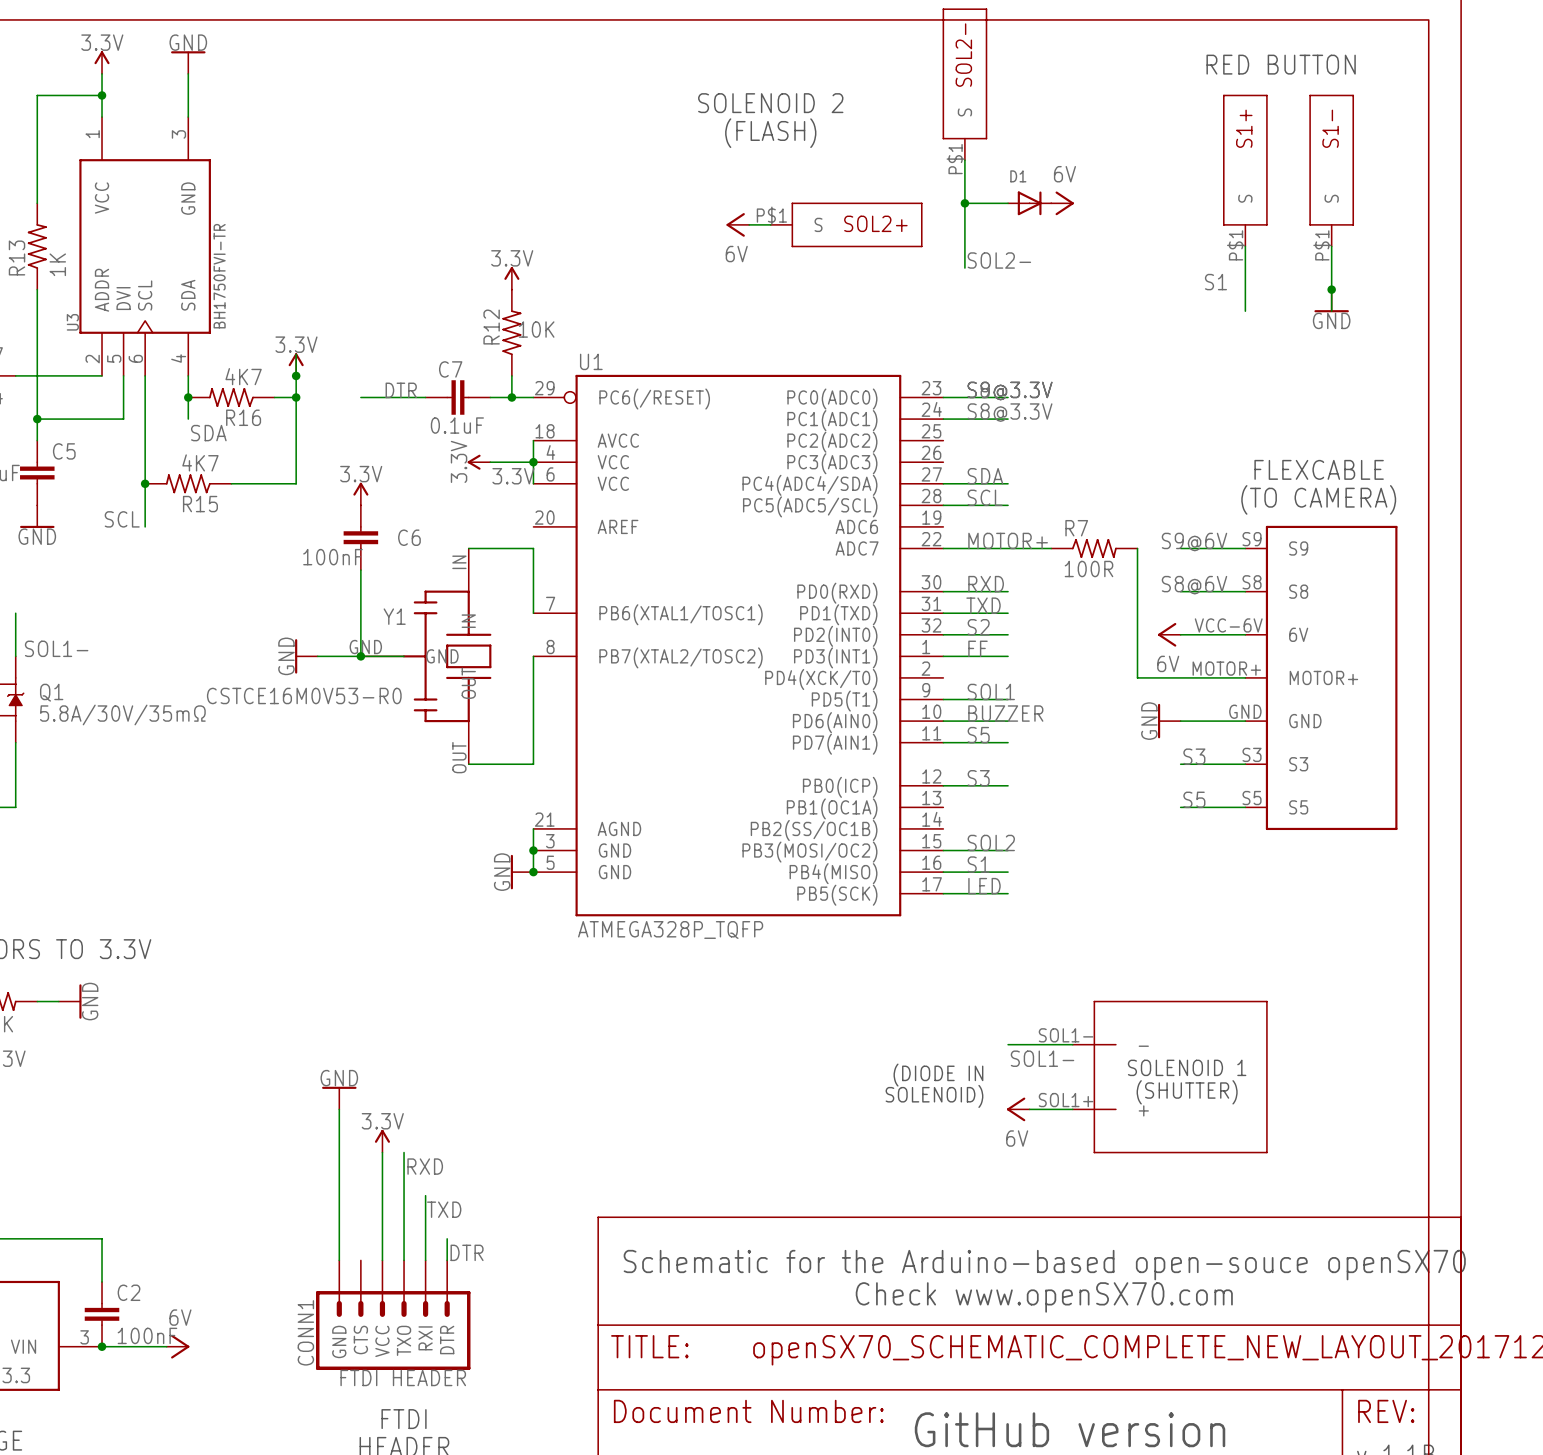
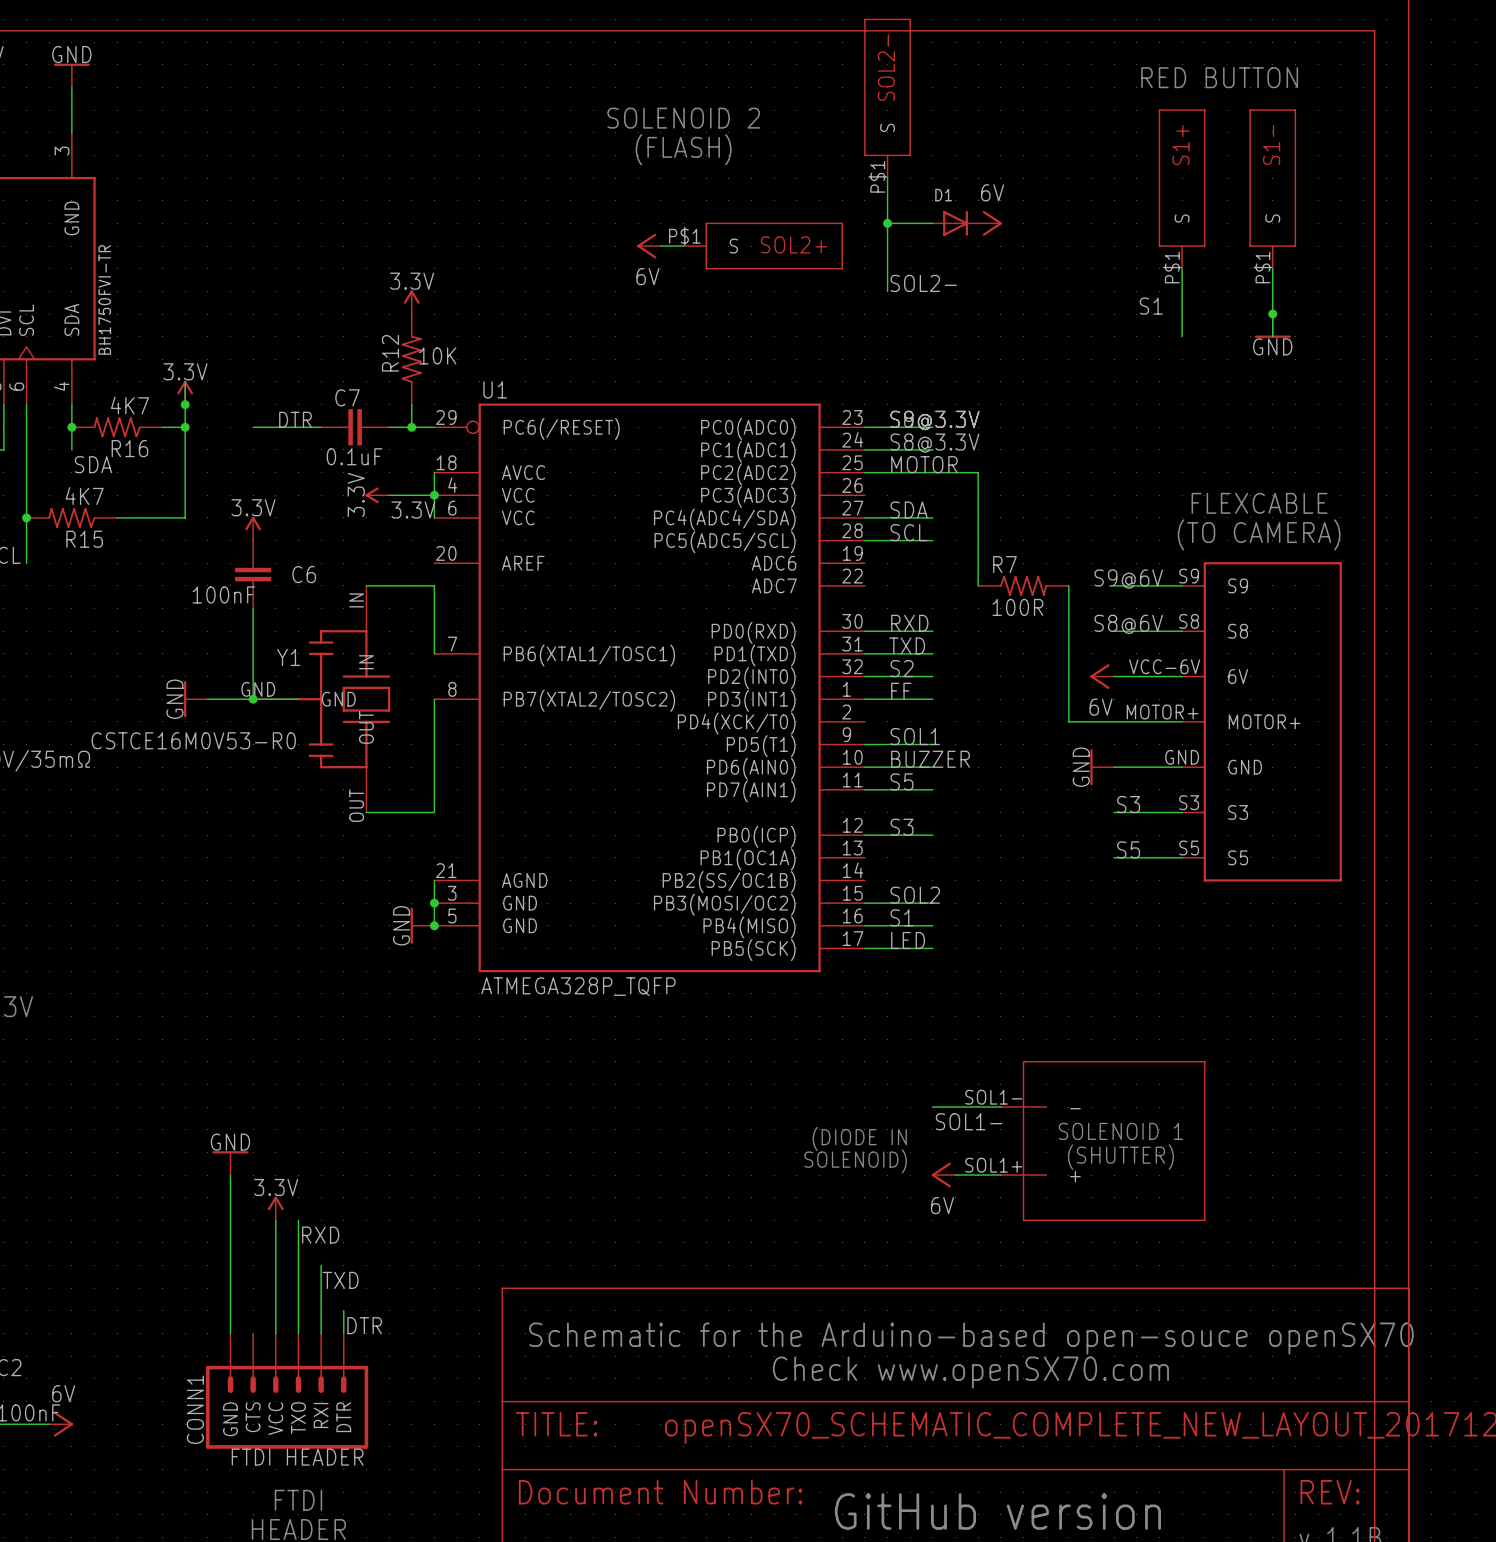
label: none -> MOTOR (924, 464)
label: MOTOR+ (1008, 540) -> none
wire: (943, 548) (1051, 548) -> (864, 472) (978, 472) (978, 585)

